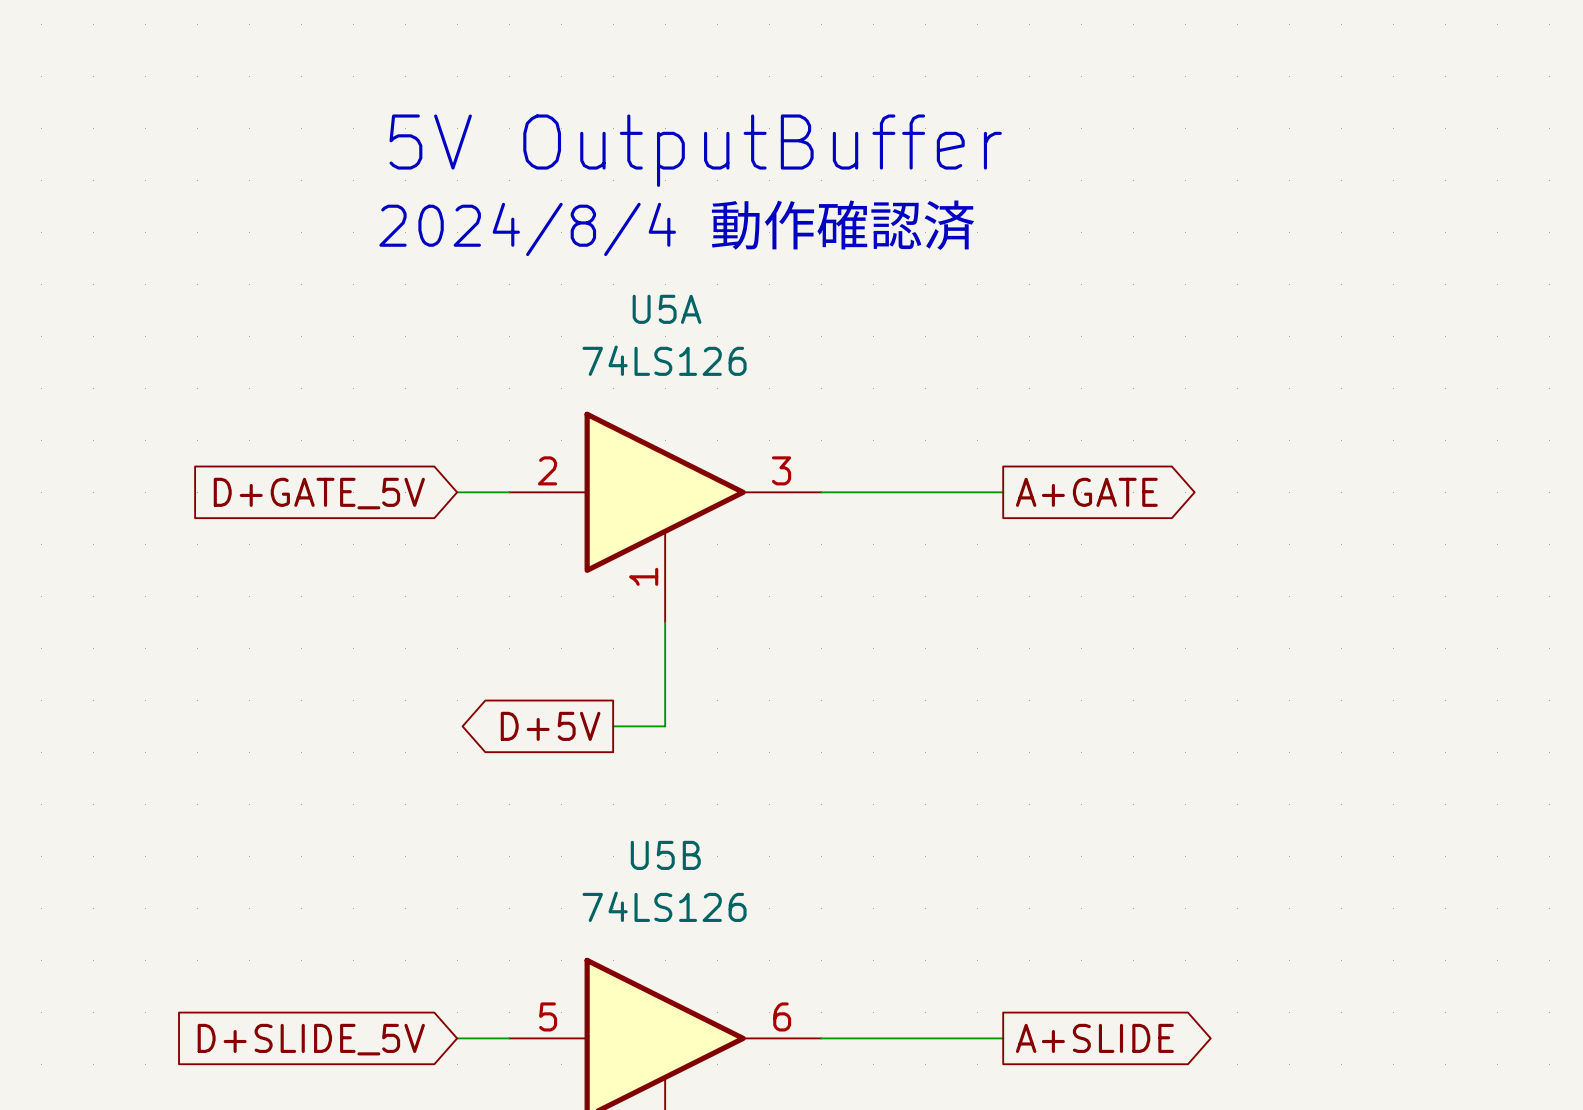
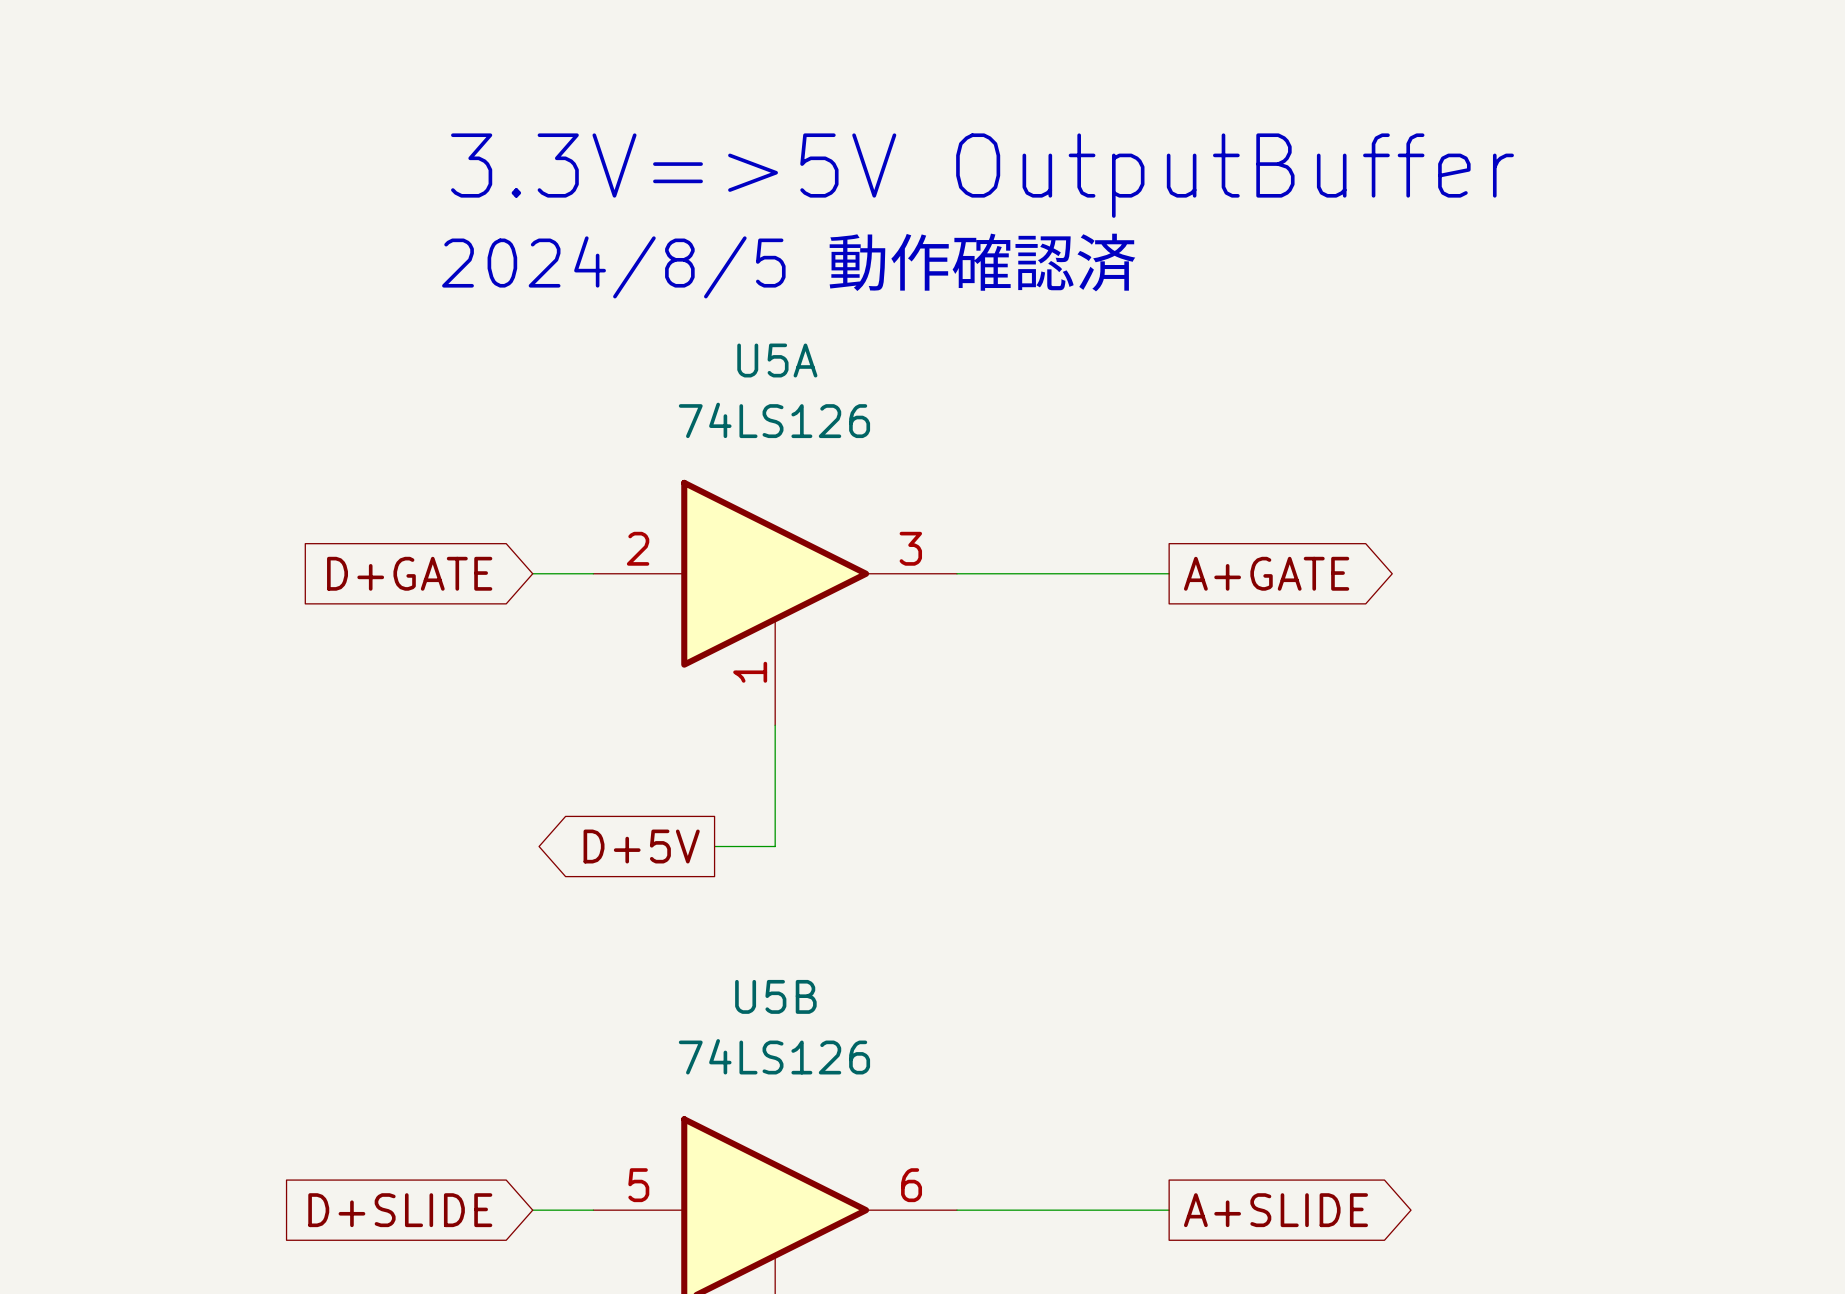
text: 5V OutputBuffer (695, 150) -> 3.3V=>5V OutputBuffer (982, 175)
text: 2024/8/4 動作確認済 (677, 227) -> 2024/8/5 動作確認済 (789, 265)
global label: D+GATE_5V (319, 493) -> D+GATE (409, 573)
global label: D+SLIDE_5V (311, 1039) -> D+SLIDE (400, 1210)

